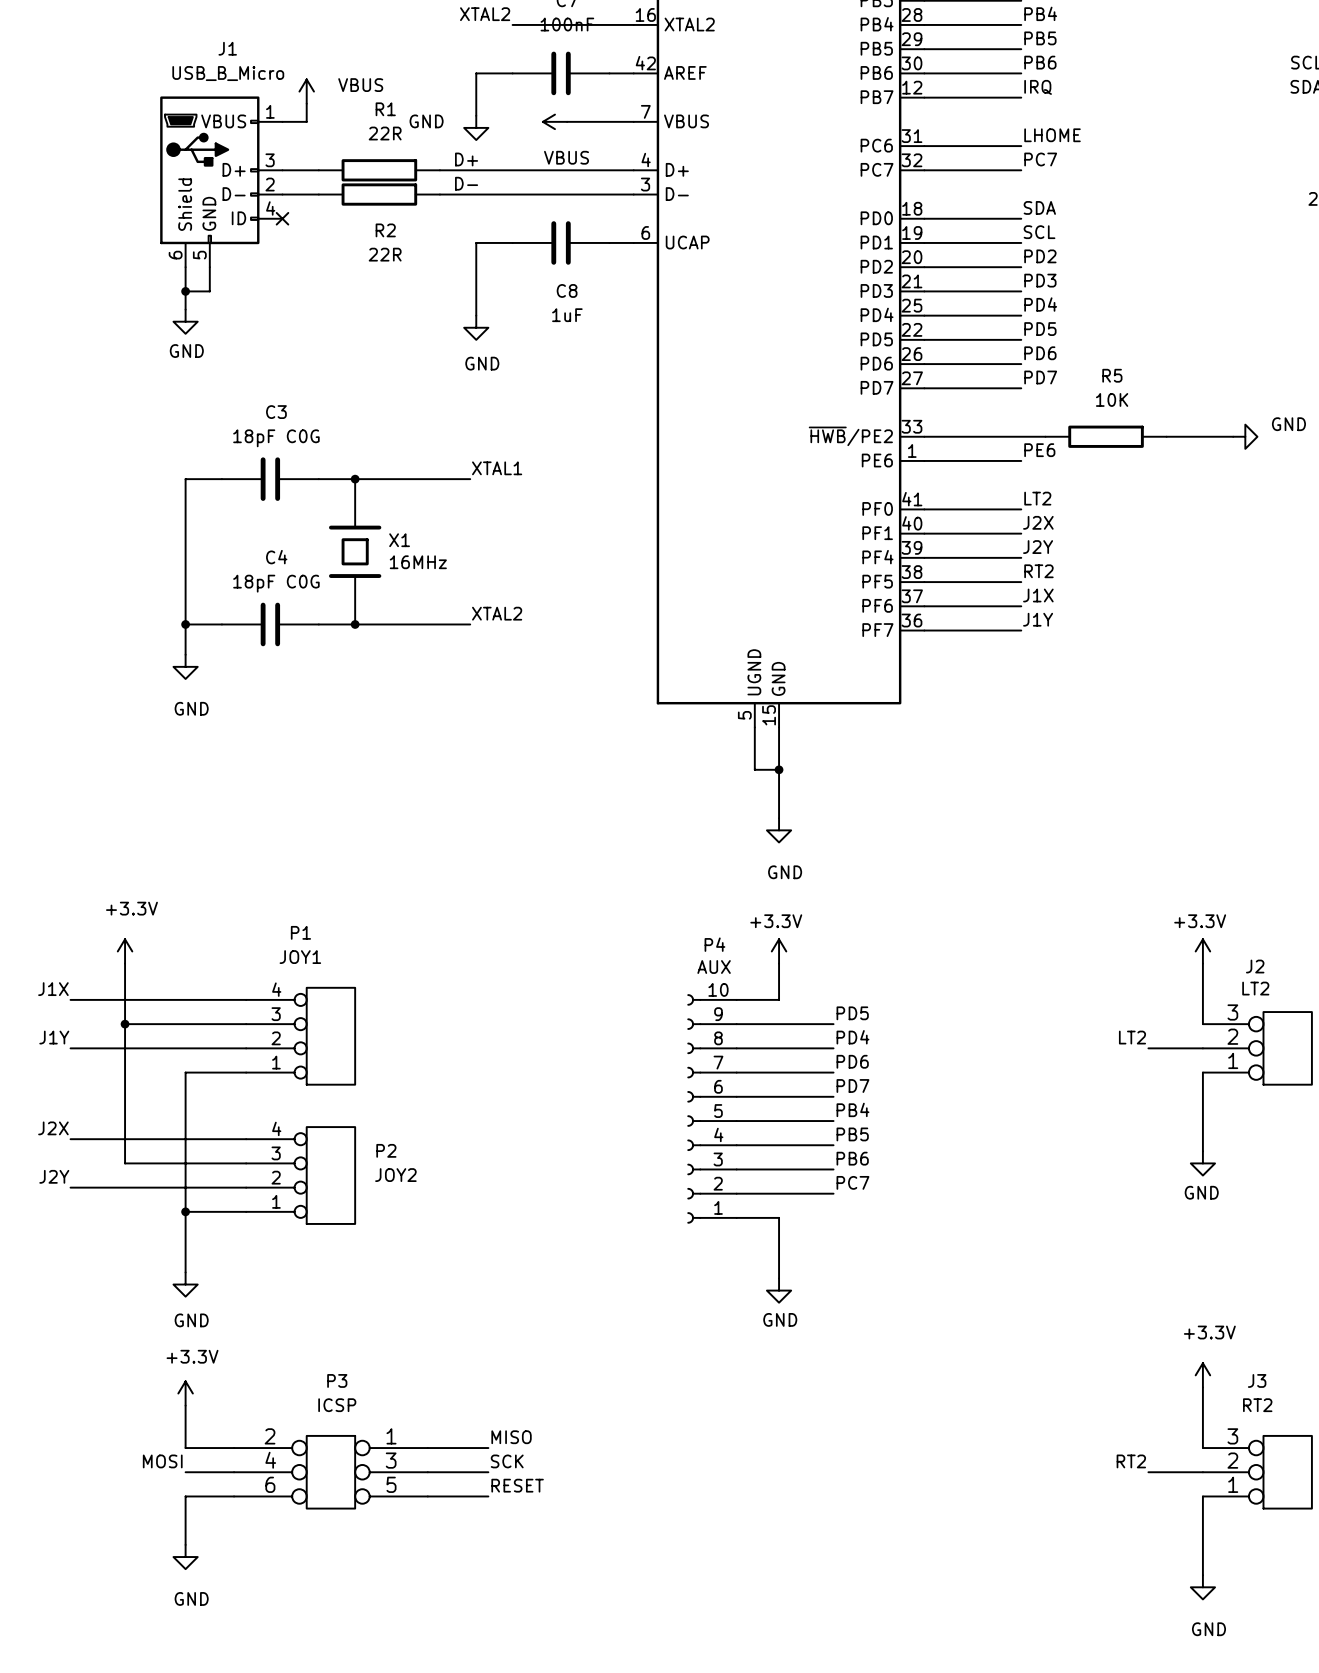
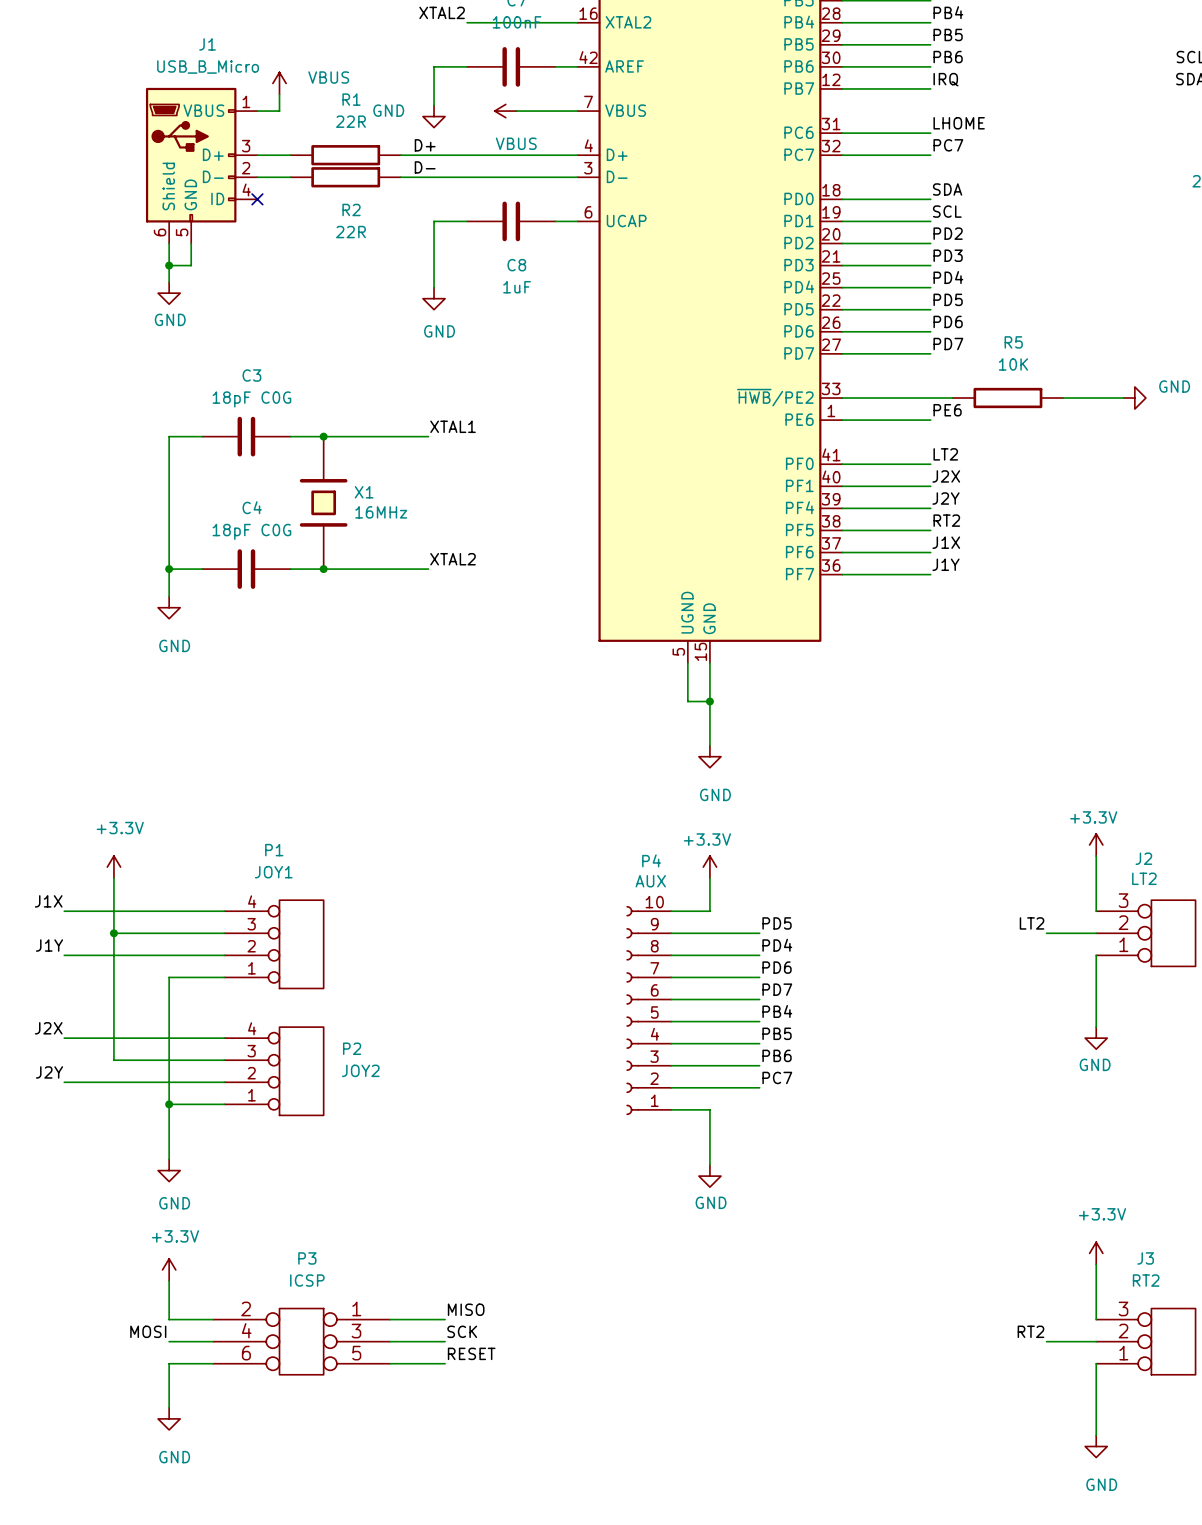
power symbol position: +3.3V (1202, 951) -> +3.3V (1096, 845)
wire: (1202, 999) (1202, 1024) -> (1046, 933) (1096, 933)
label position: LT2 (1132, 1037) -> LT2 (1032, 923)
wire: (1148, 1048) (1202, 1048) -> (1096, 977) (1096, 955)
J2 position: (1257, 1048) -> (1145, 933)
power symbol position: GND (1202, 1163) -> GND (1096, 1038)

